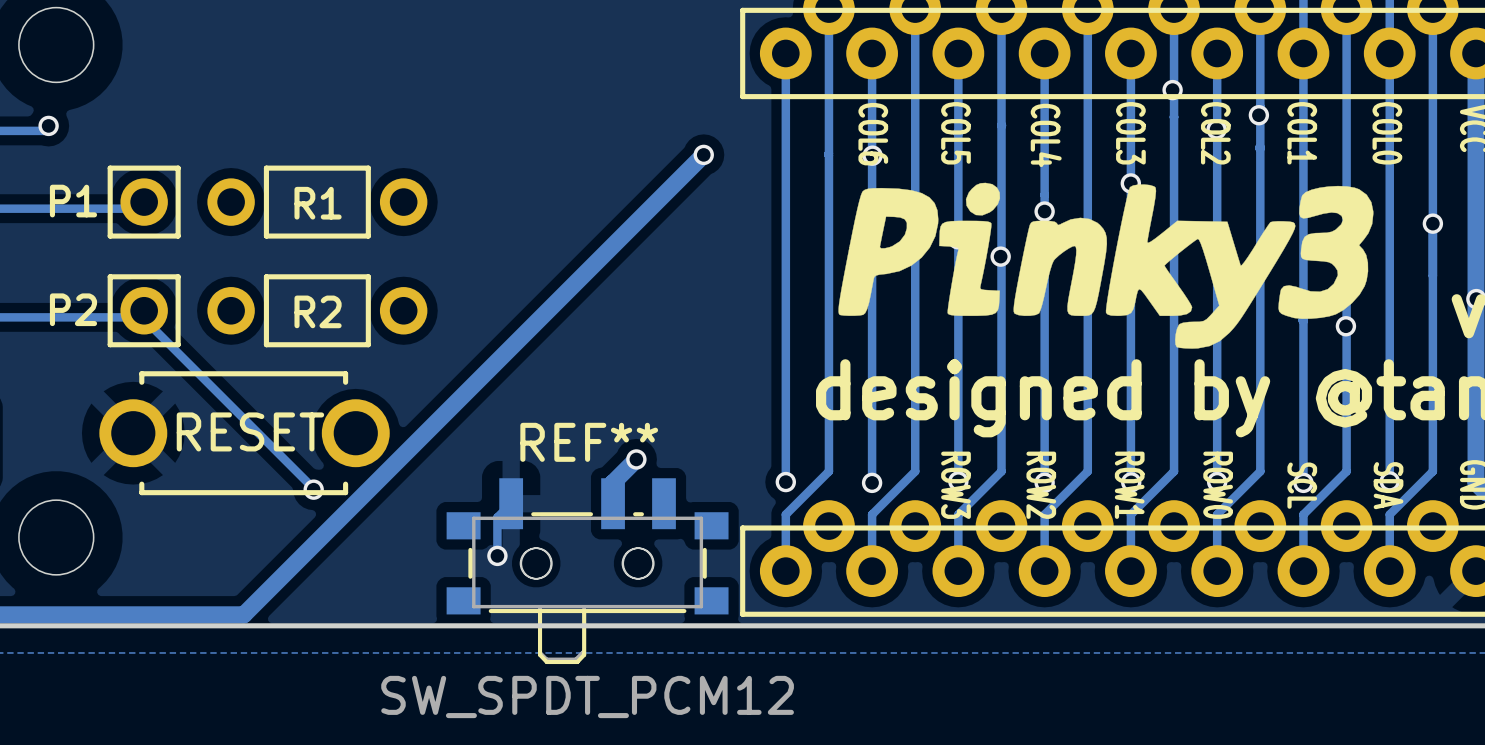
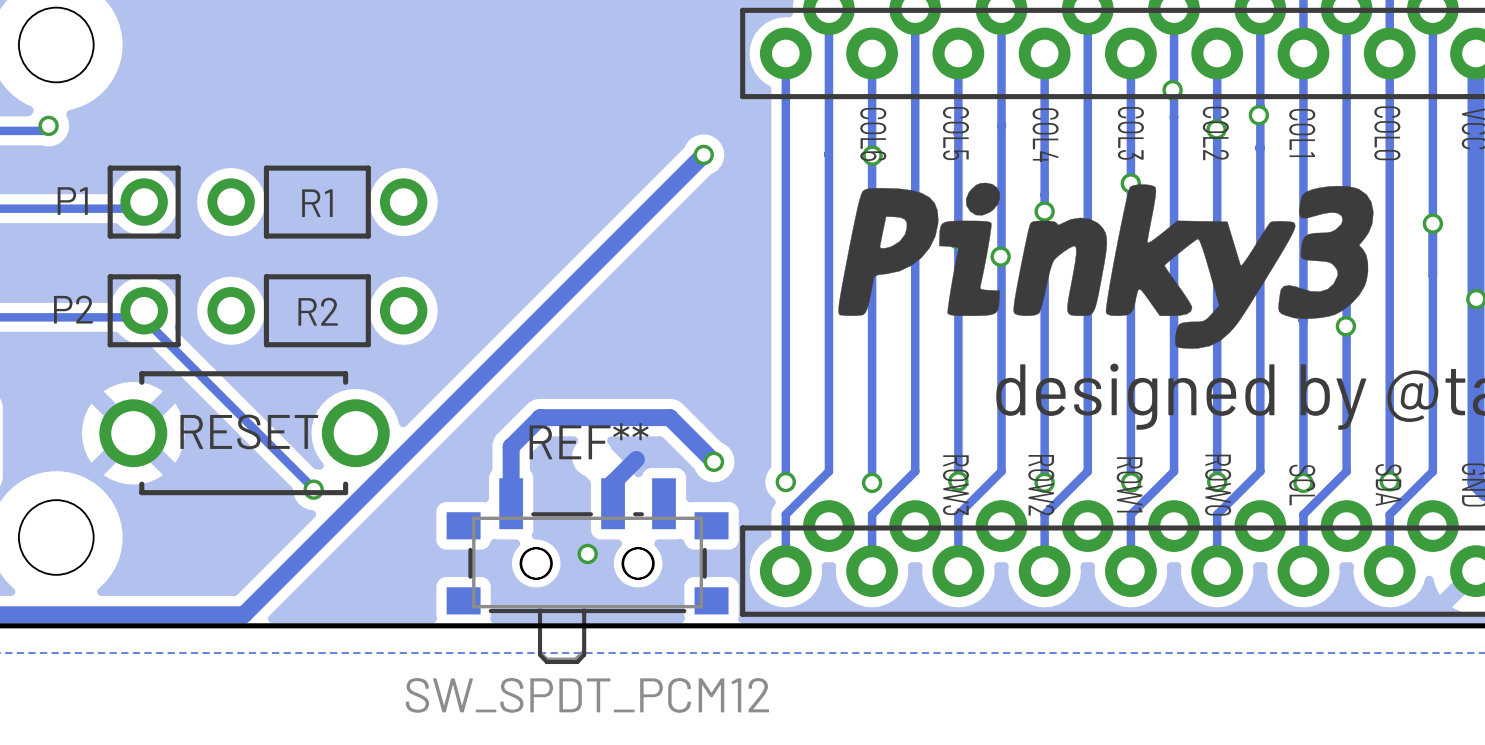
via: (636, 459) -> none
track: none -> (713, 461) (669, 417) (540, 417) (511, 446) (511, 503) (508, 501)
via: none -> (713, 461)
track: (511, 503) (497, 517) (497, 555) -> none
via: none -> (587, 553)
via: (497, 555) -> none

